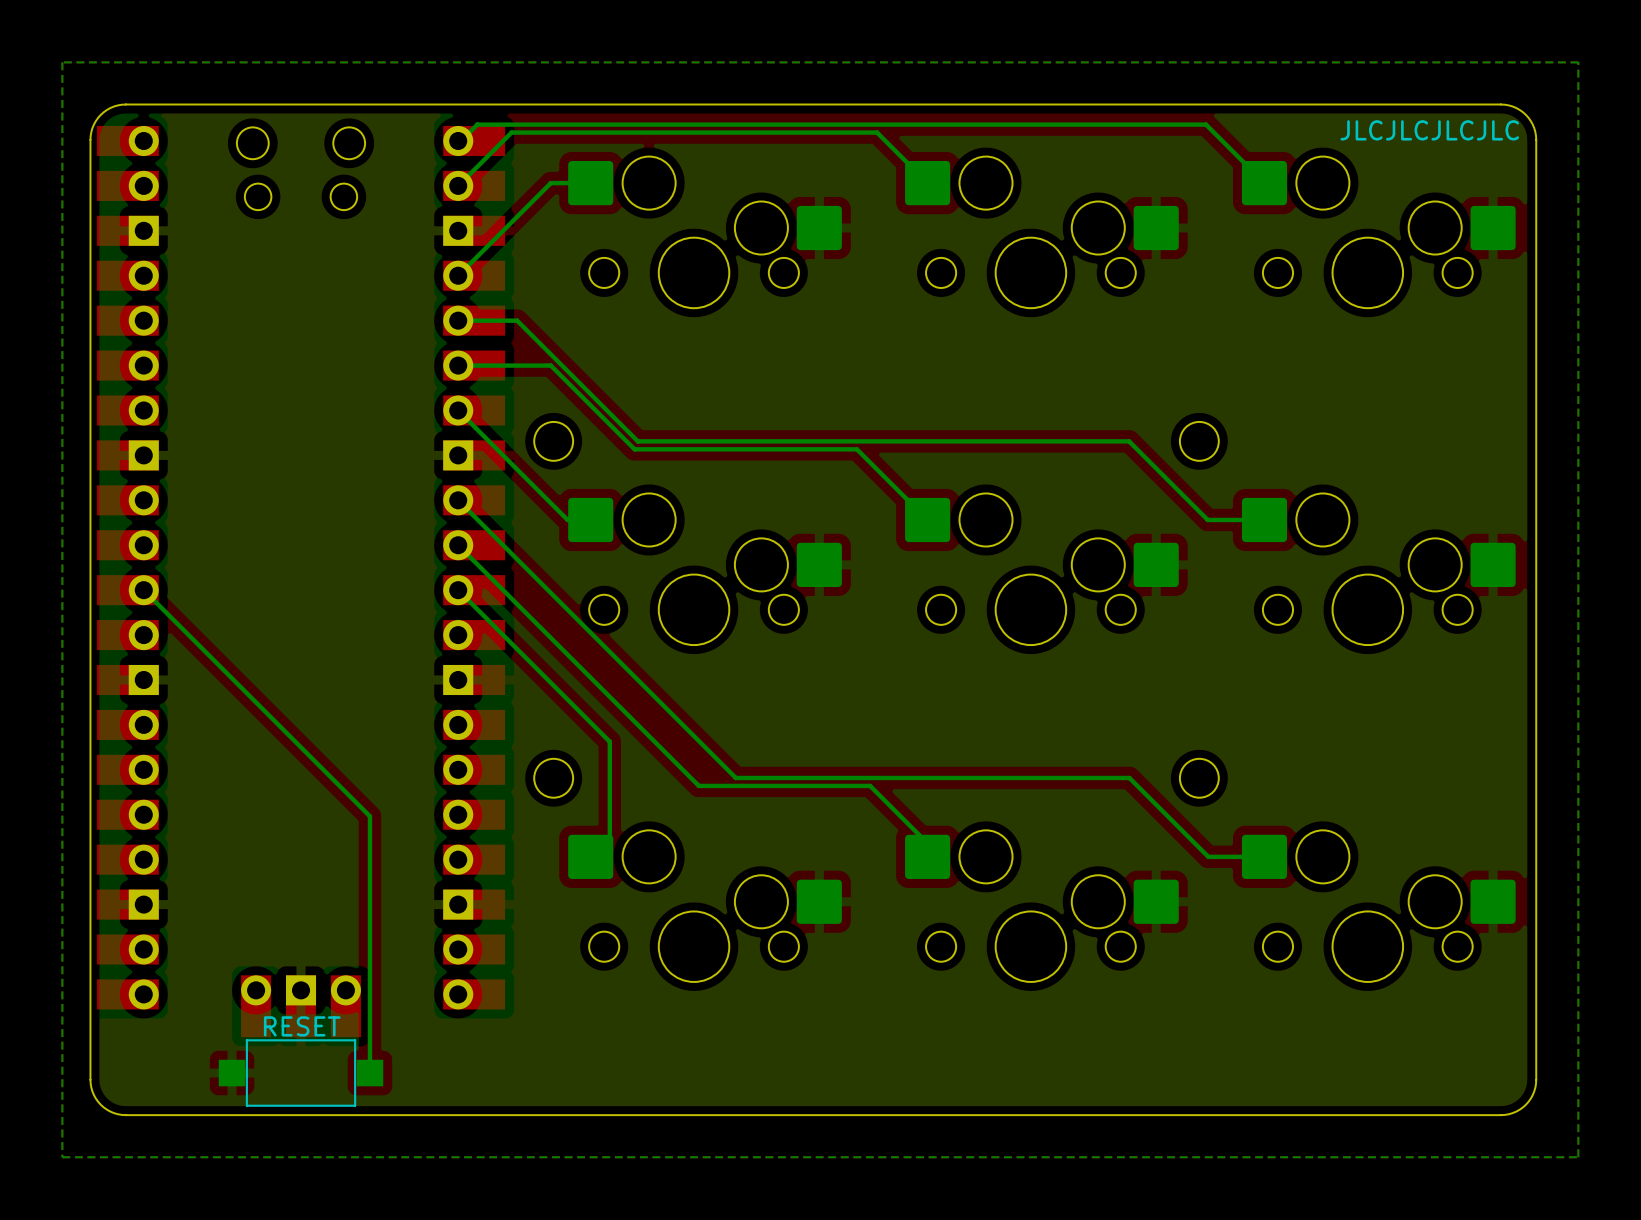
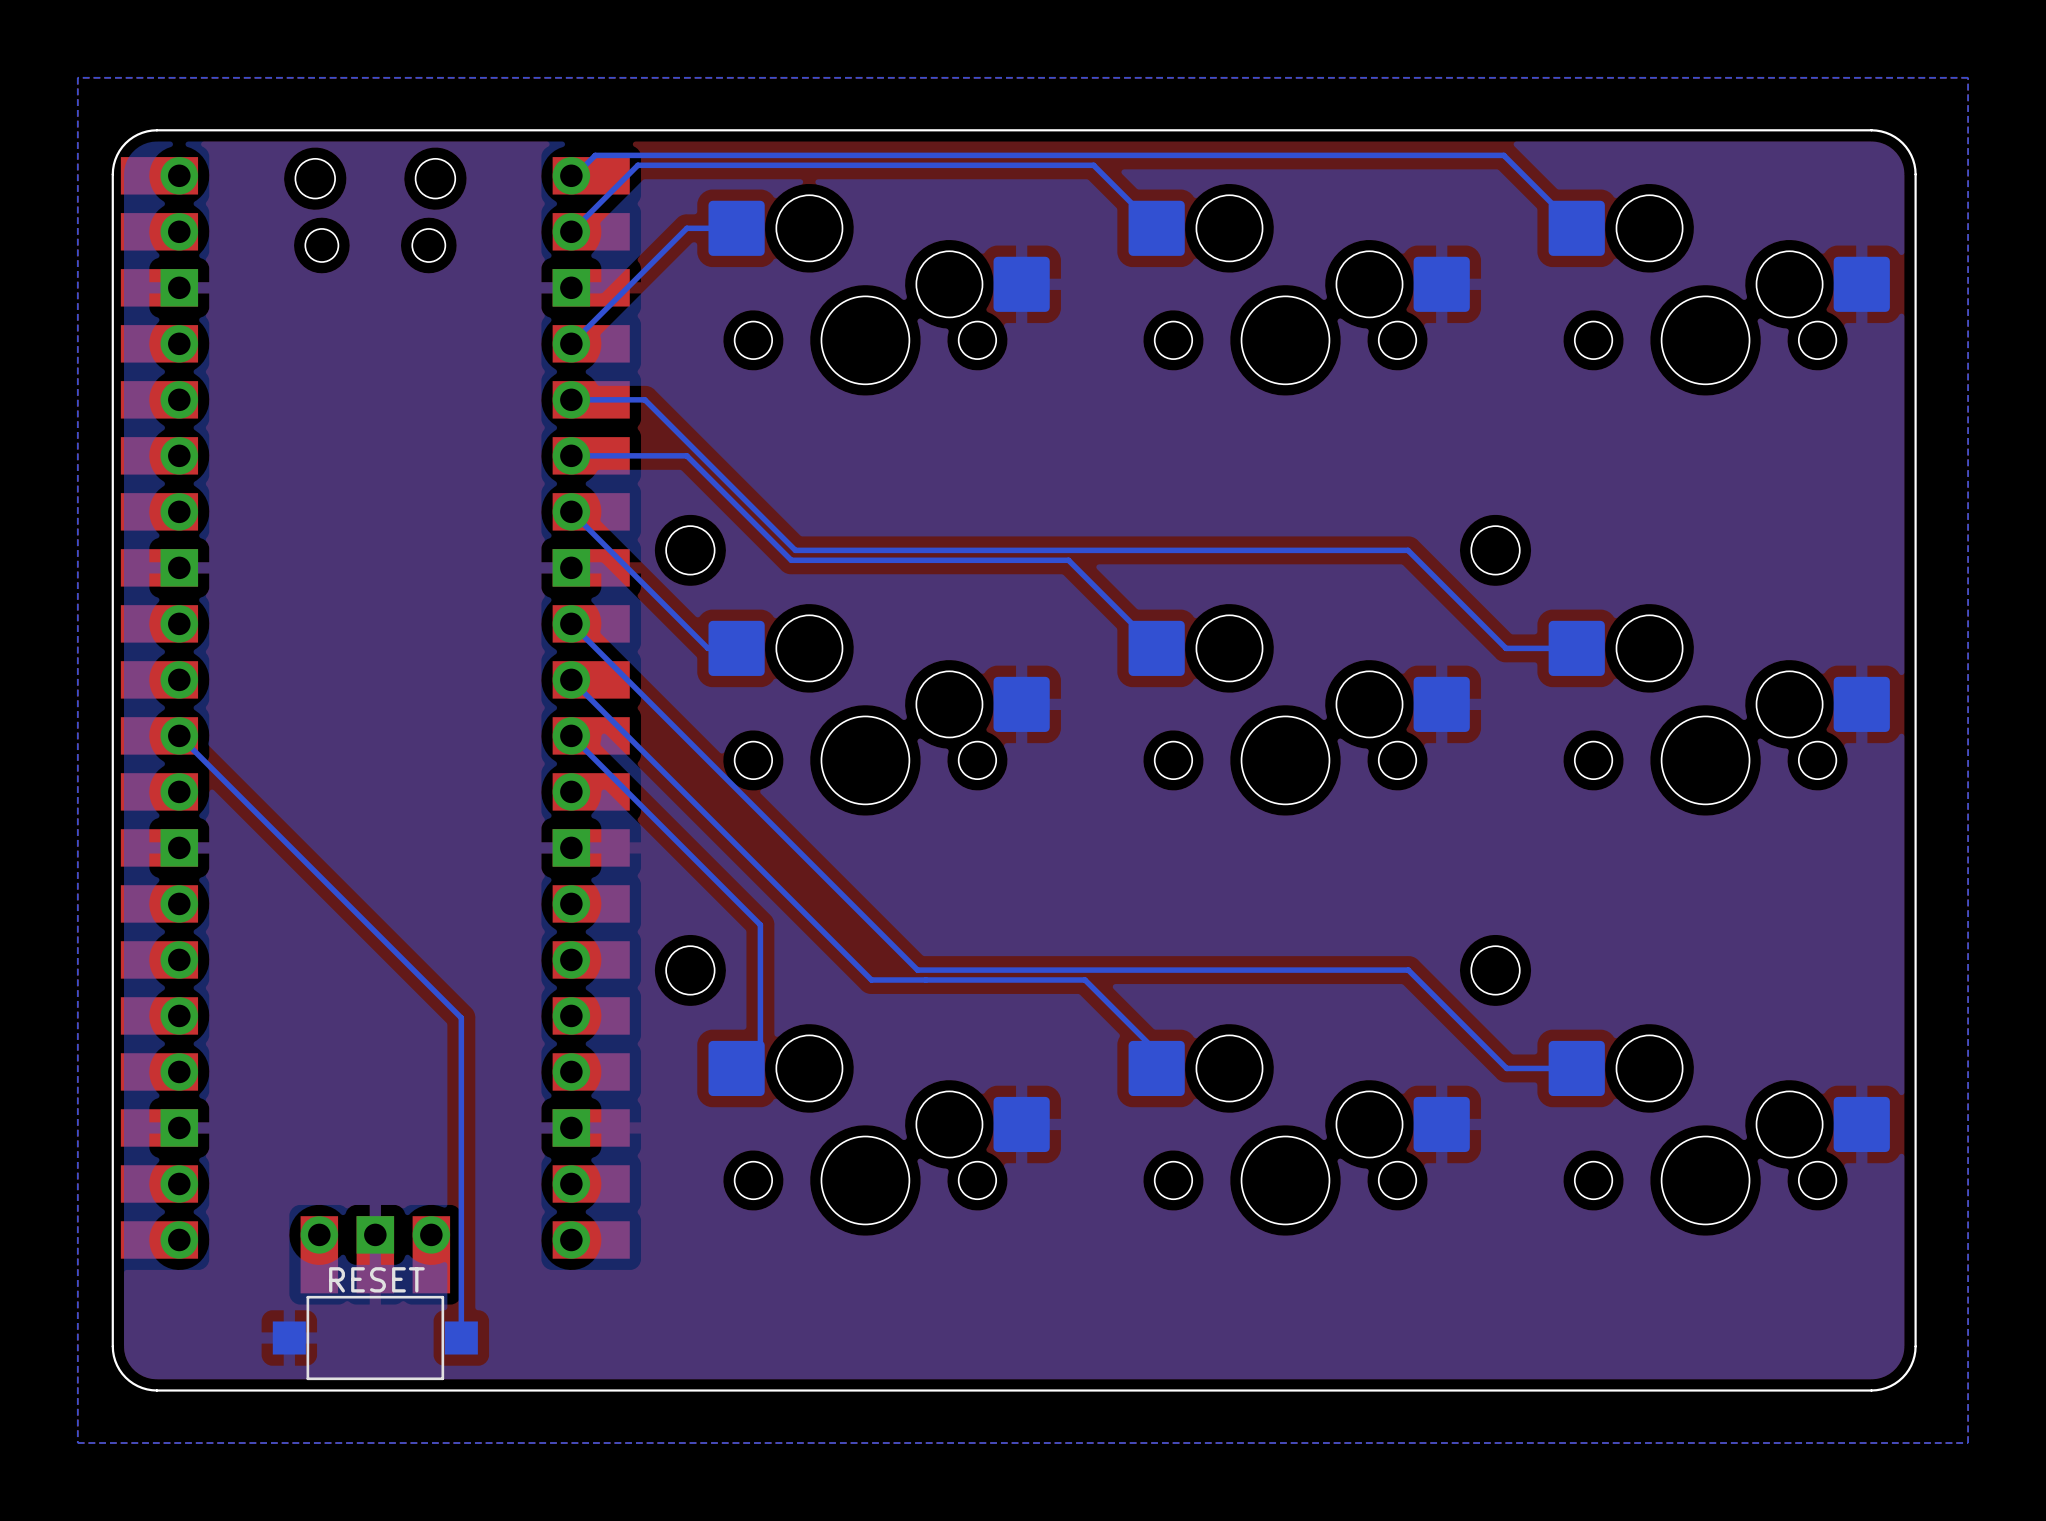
text: JLCJLCJLCJLC (1429, 130) -> none

